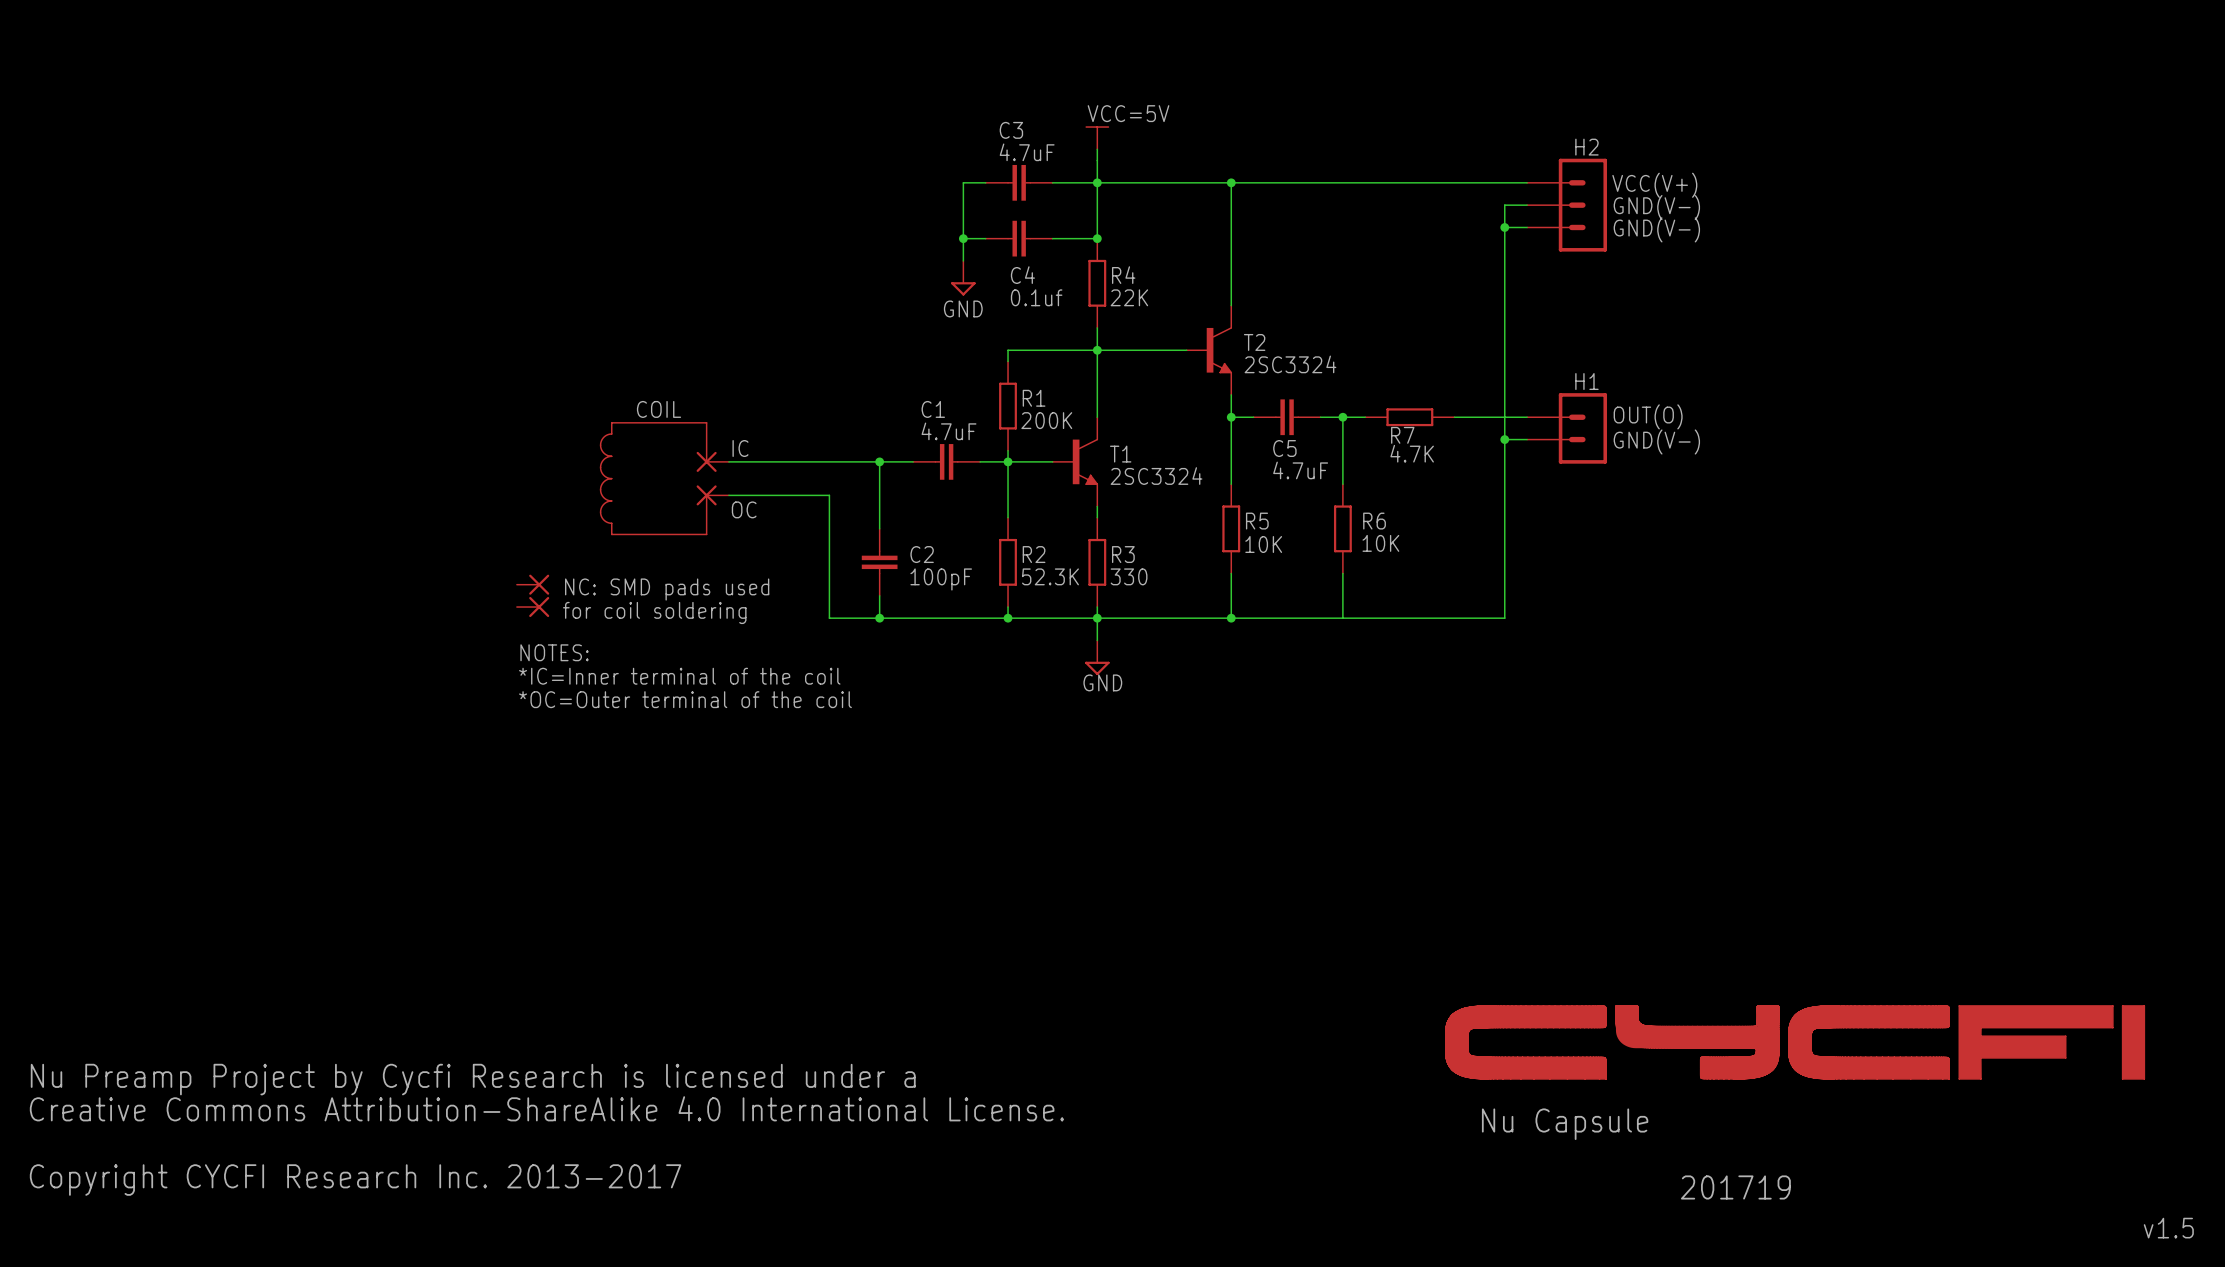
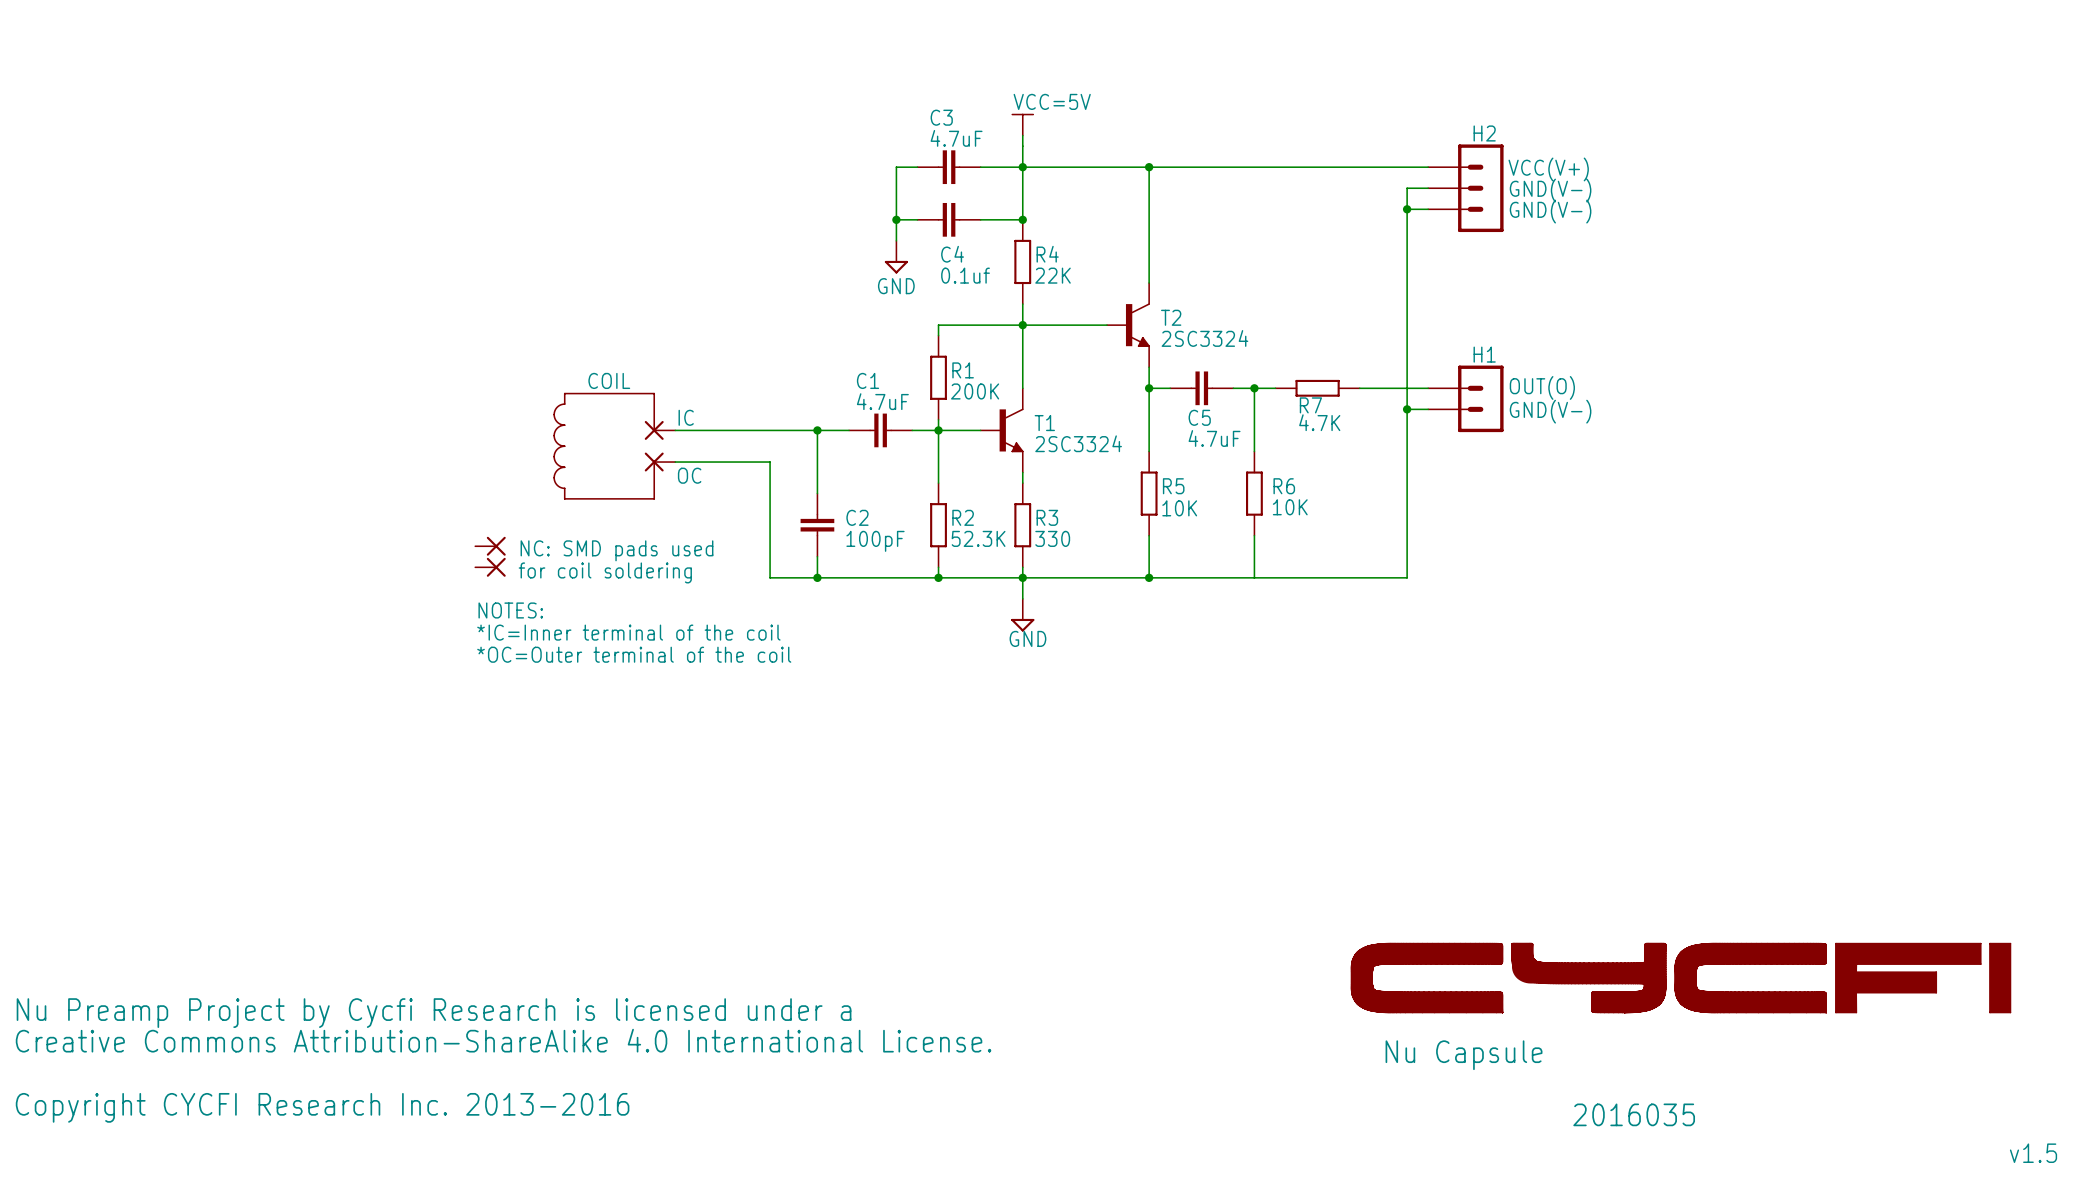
text: Copyright CYCFI Research Inc. 2013-2017 (355, 1180) -> Copyright CYCFI Research Inc. 2013-2016 (322, 1107)
text: 201719 (1735, 1187) -> 2016035 (1634, 1114)

